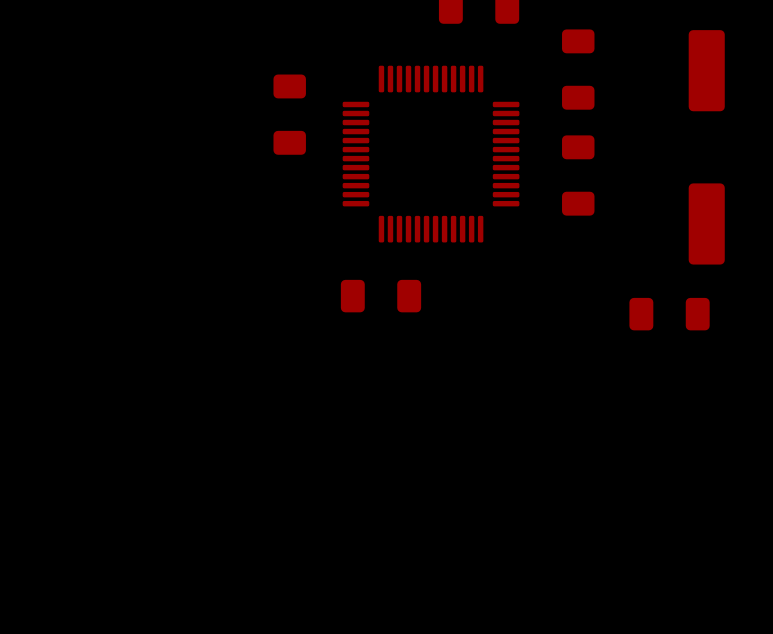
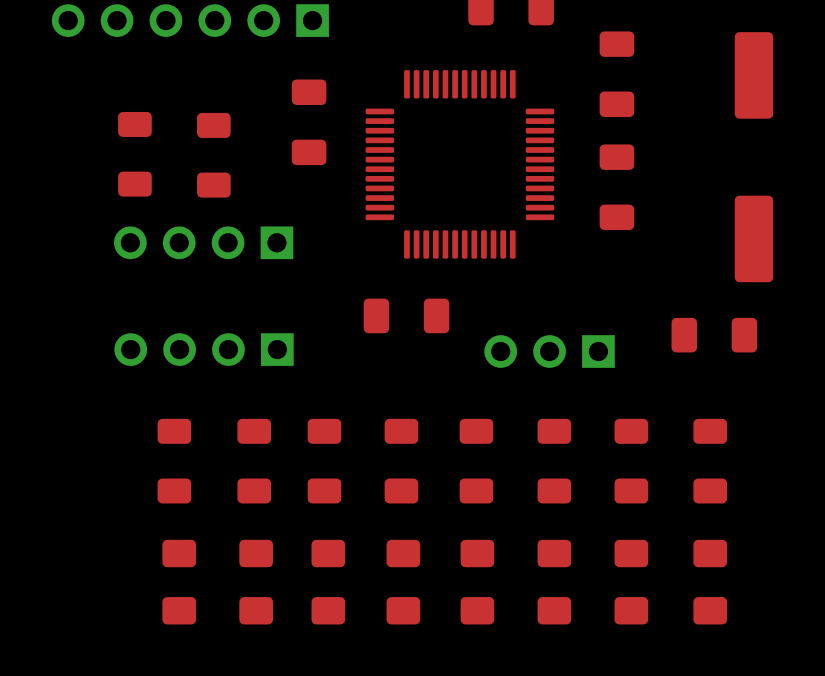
part: none -> (190, 20)
part: none -> (134, 154)
part: none -> (213, 155)
part: none -> (203, 242)
part: none -> (204, 349)
part: none -> (549, 351)
part: none -> (174, 461)
part: none -> (254, 461)
part: none -> (324, 461)
part: none -> (401, 461)
part: none -> (476, 461)
part: none -> (554, 461)
part: none -> (631, 461)
part: none -> (710, 461)
part: none -> (179, 582)
part: none -> (256, 582)
part: none -> (328, 582)
part: none -> (403, 582)
part: none -> (477, 582)
part: none -> (554, 582)
part: none -> (631, 582)
part: none -> (710, 582)

